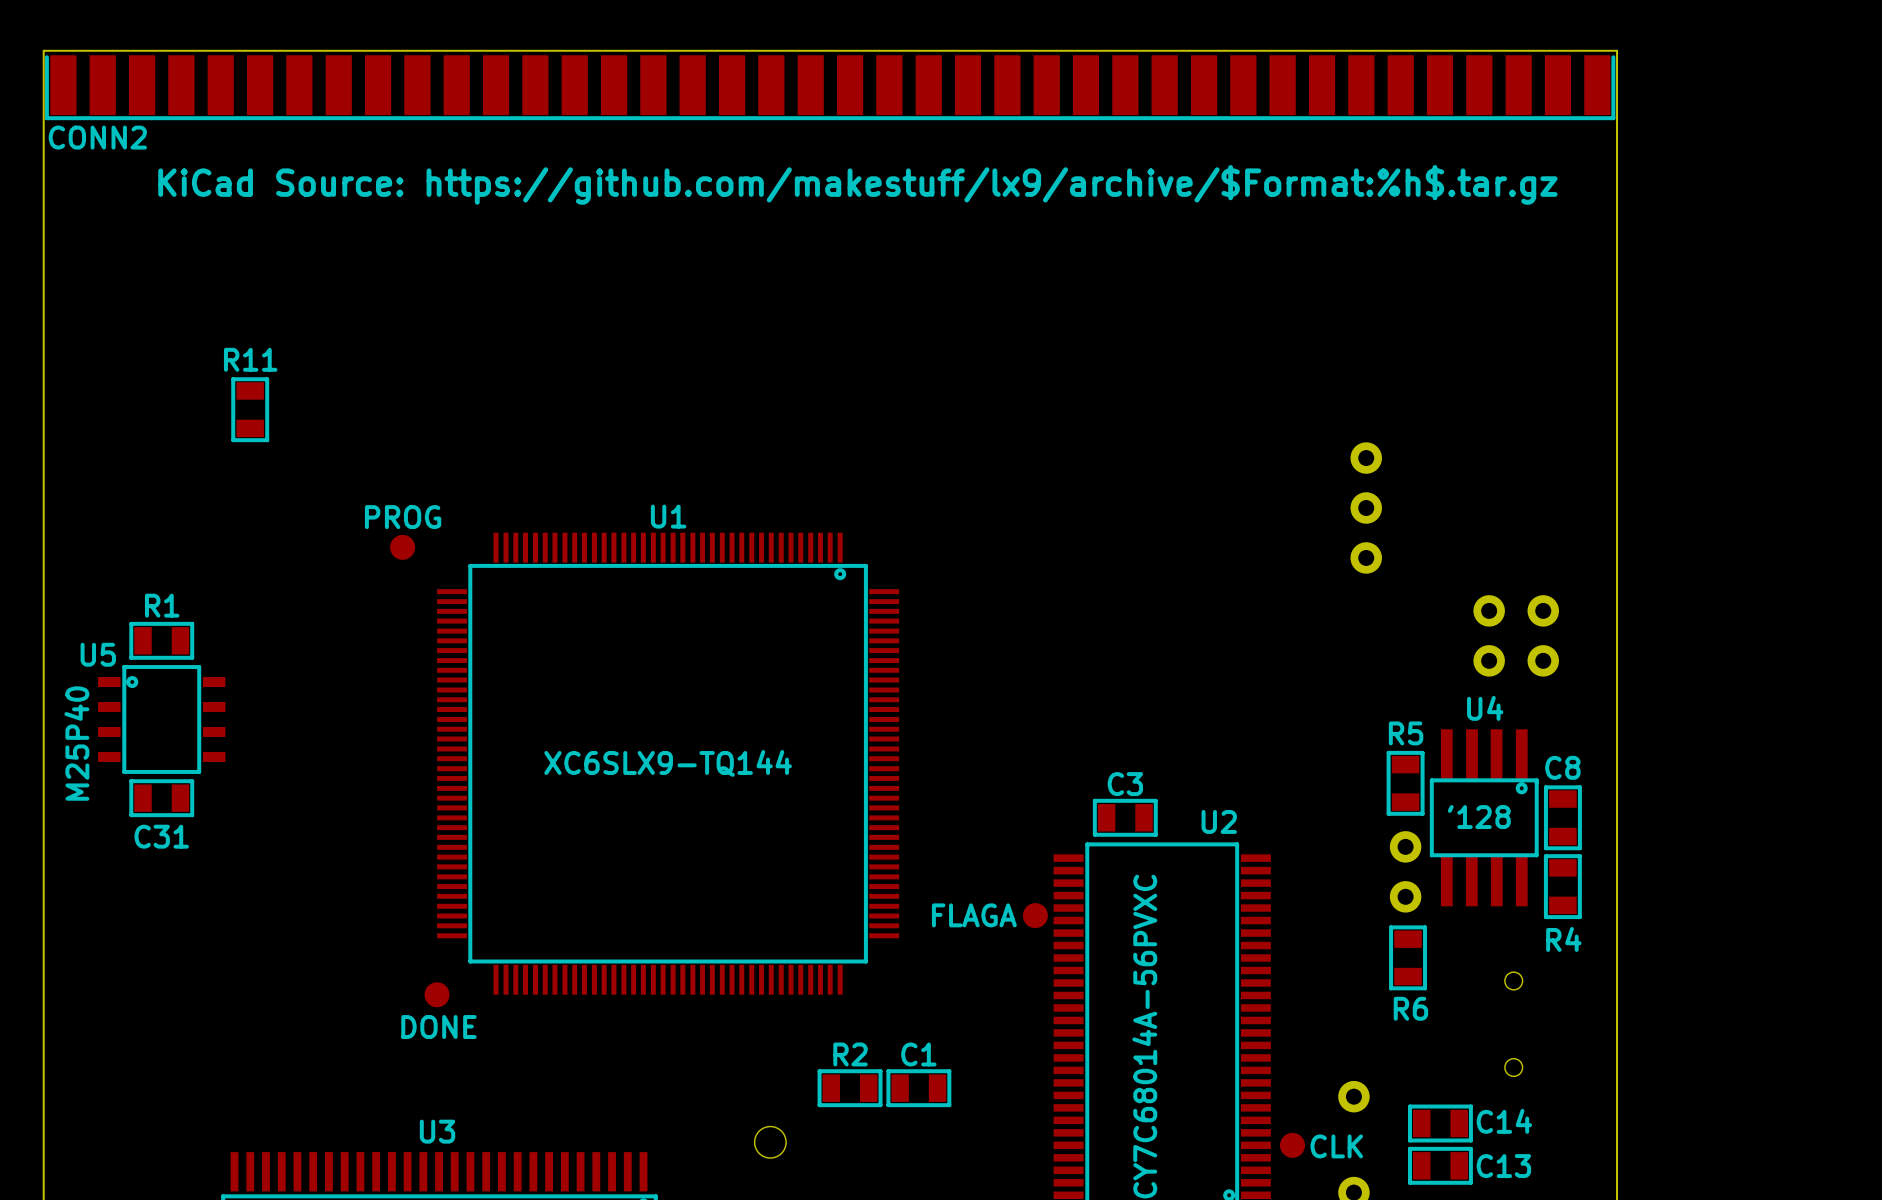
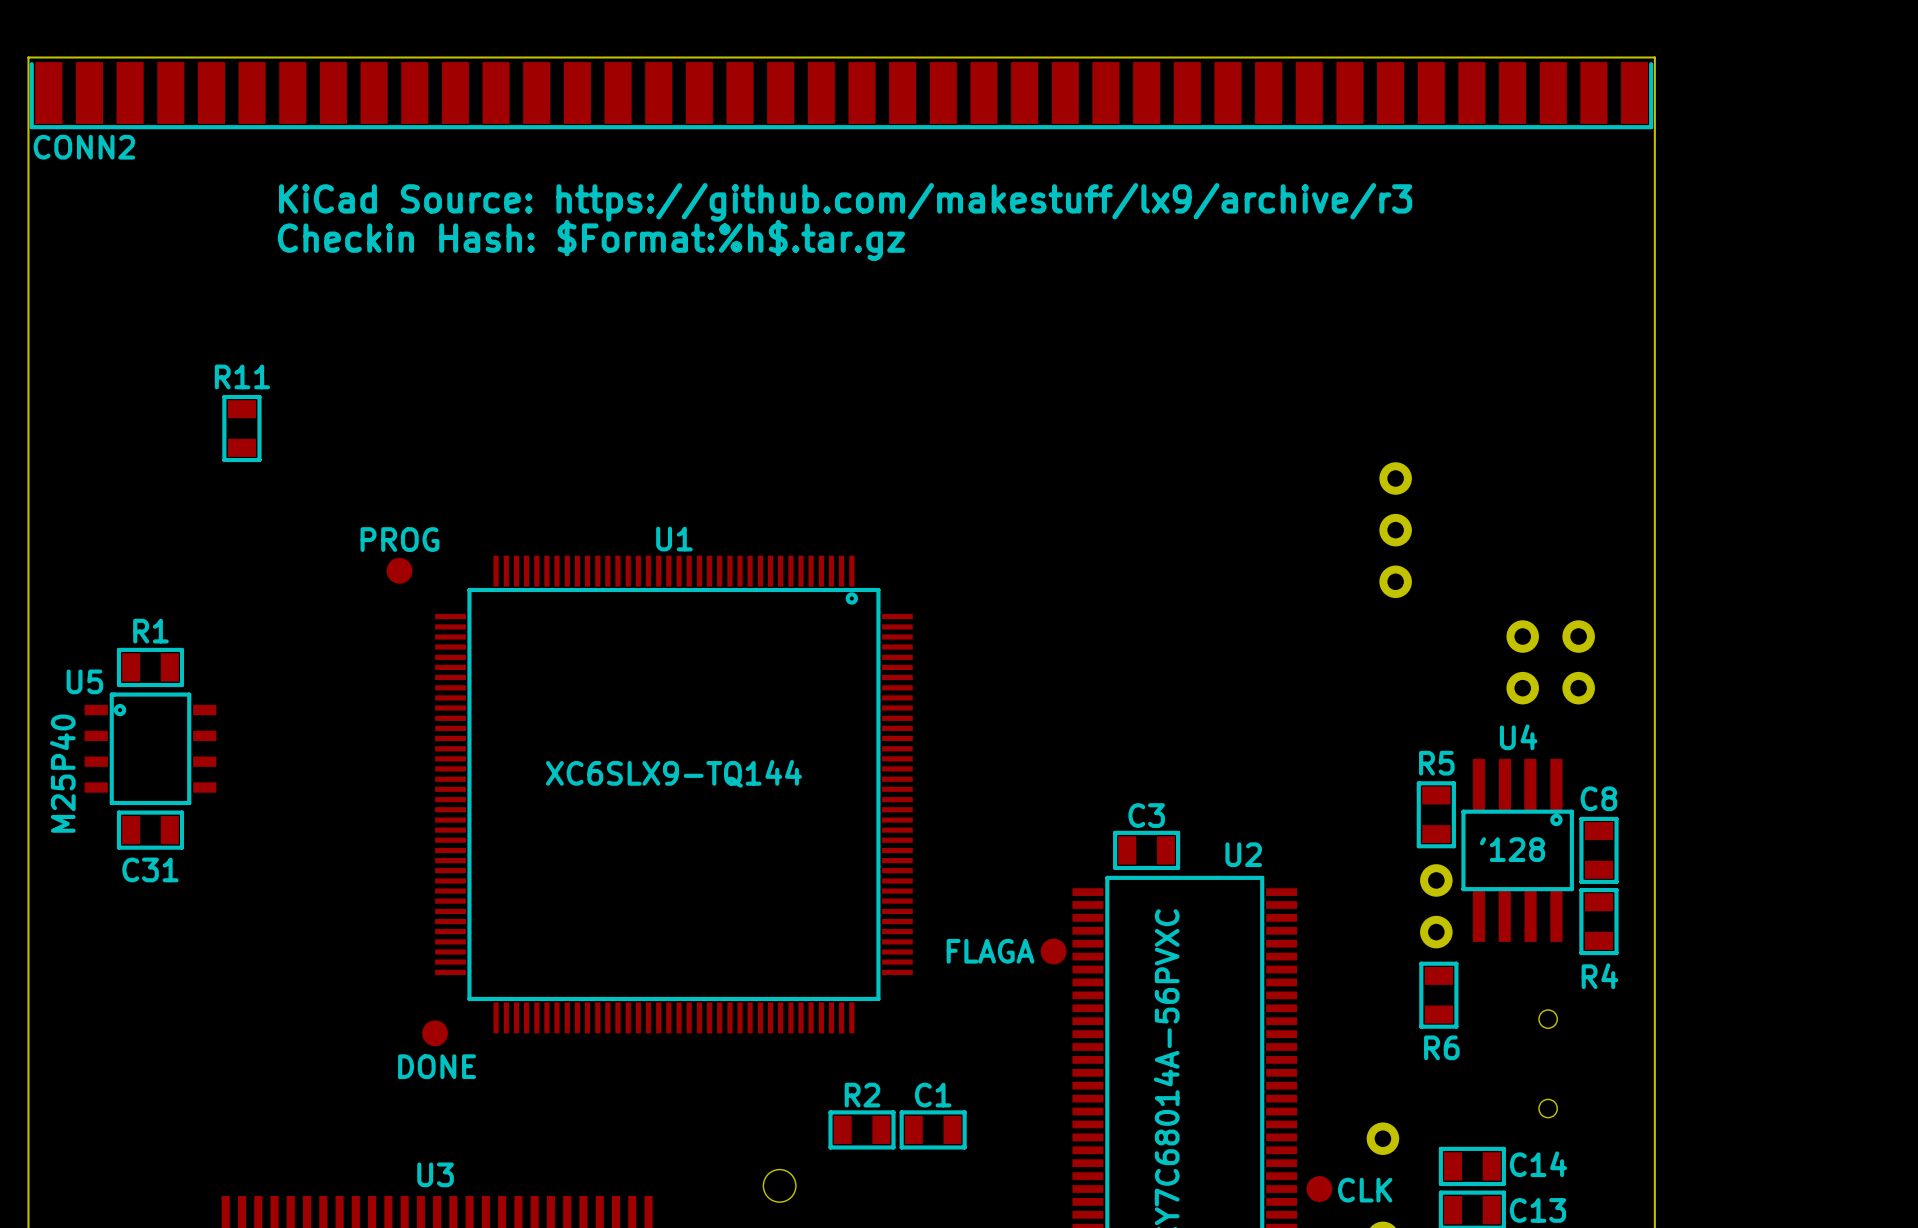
text: KiCad Source: https://github.com/makestuff/lx9/archive/$Format:%h$.tar.gz (857, 184) -> KiCad Source: https://github.com/makestuff/lx9/archive/r3 (845, 202)
text: none -> Checkin Hash: $Format:%h$.tar.gz (591, 240)
U1 value position: XC6SLX9-TQ144 (668, 763) -> XC6SLX9-TQ144 (673, 773)

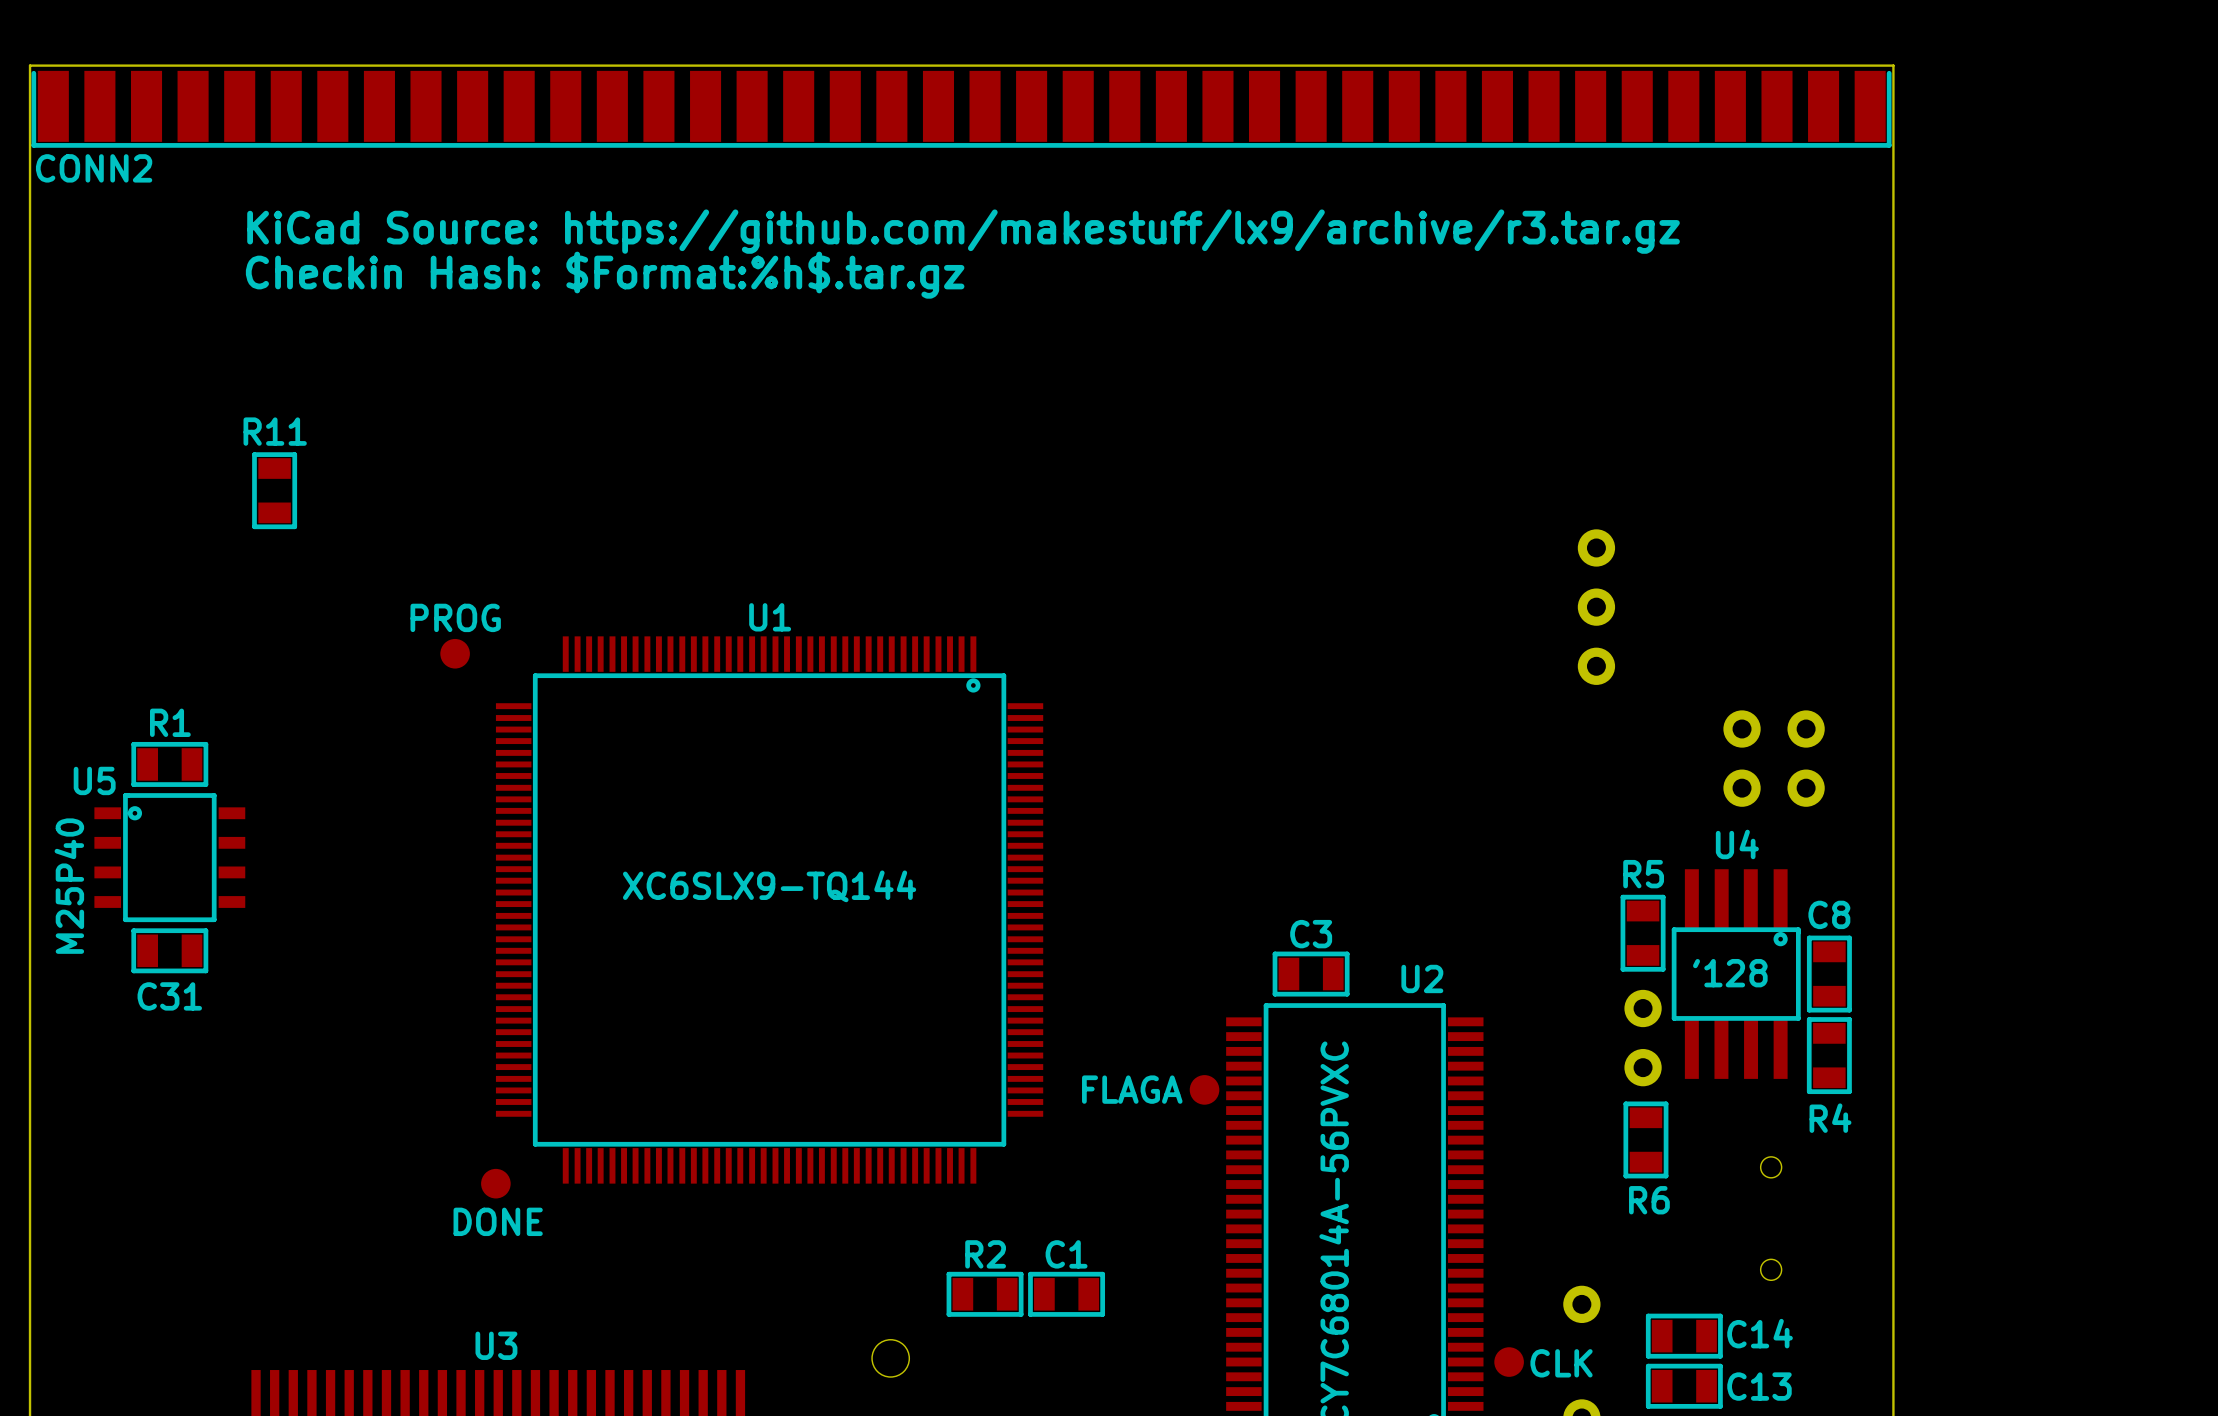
text: KiCad Source: https://github.com/makestuff/lx9/archive/r3 (845, 202) -> KiCad Source: https://github.com/makestuff/lx9/archive/r3.tar.gz (963, 231)
text position: Checkin Hash: $Format:%h$.tar.gz (591, 240) -> Checkin Hash: $Format:%h$.tar.gz (605, 275)

